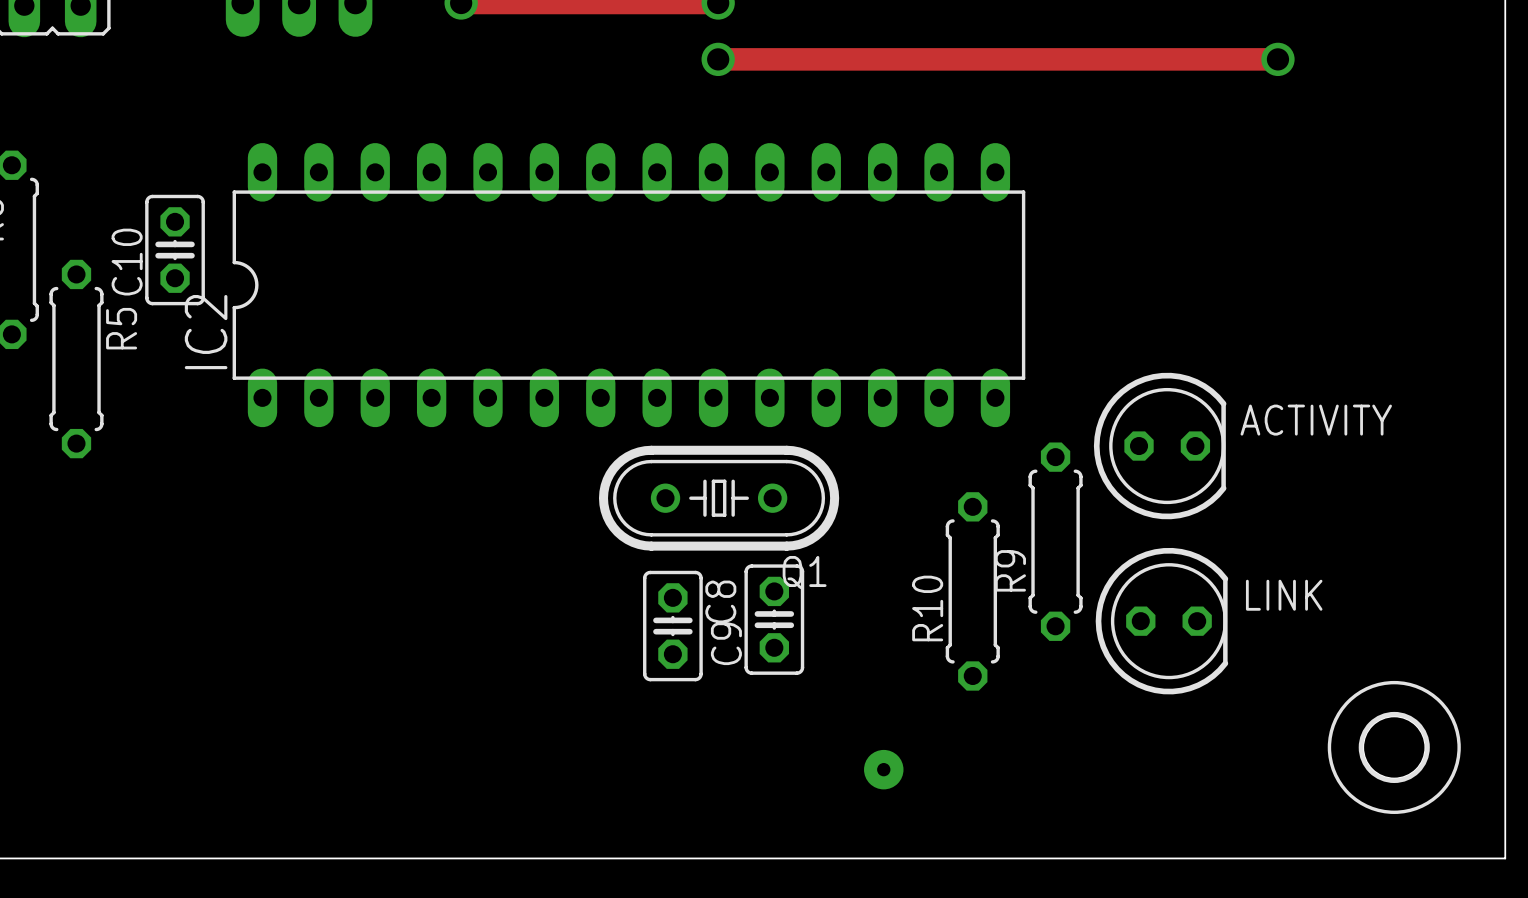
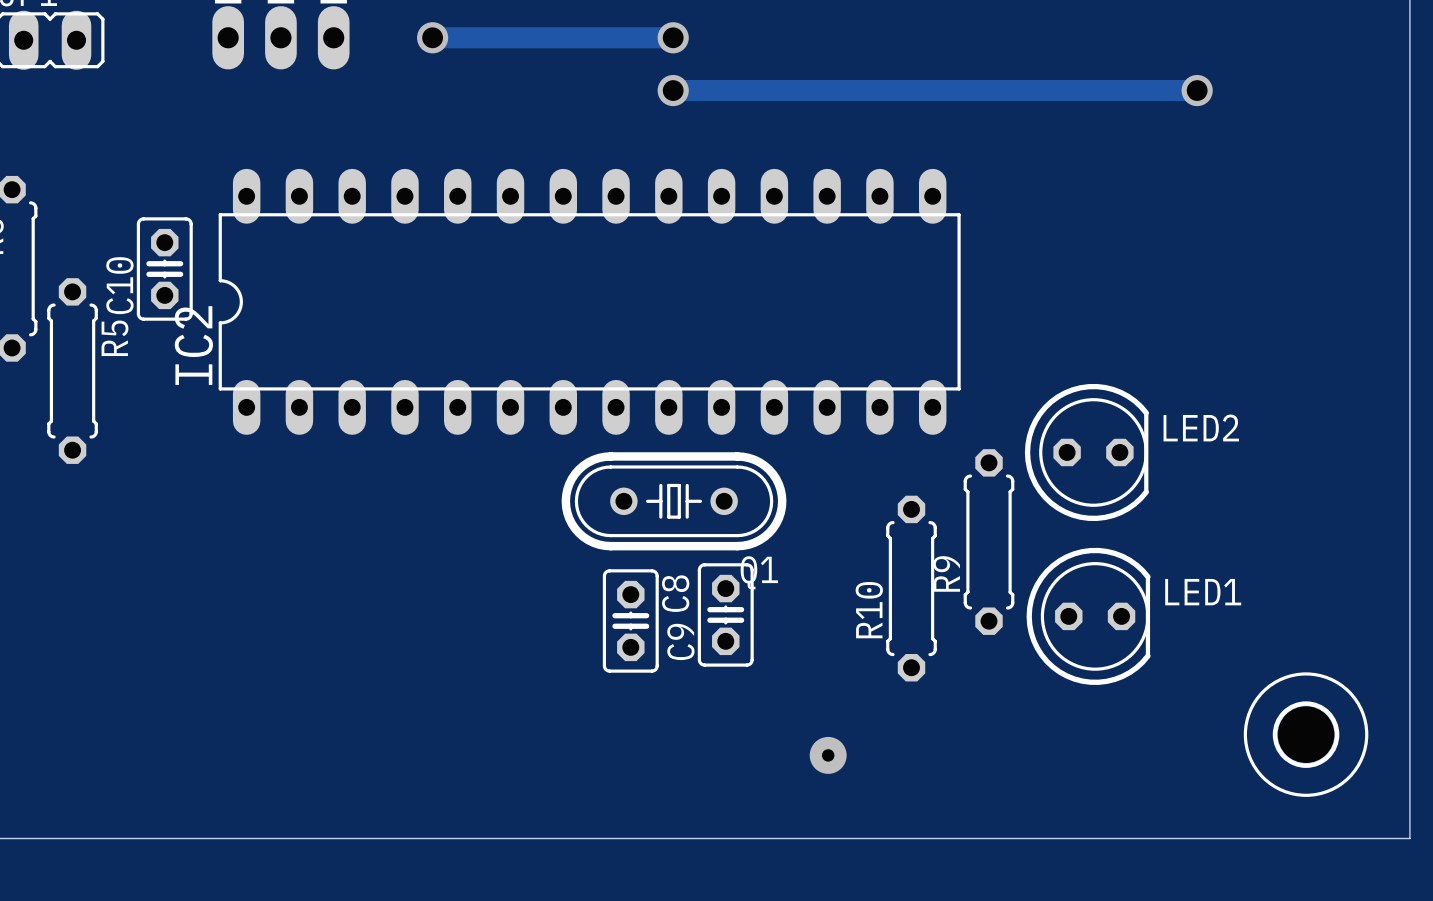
ACTIVITY name: ACTIVITY (1316, 420) -> LED2 (1201, 427)
LINK name: LINK (1284, 595) -> LED1 (1203, 592)

